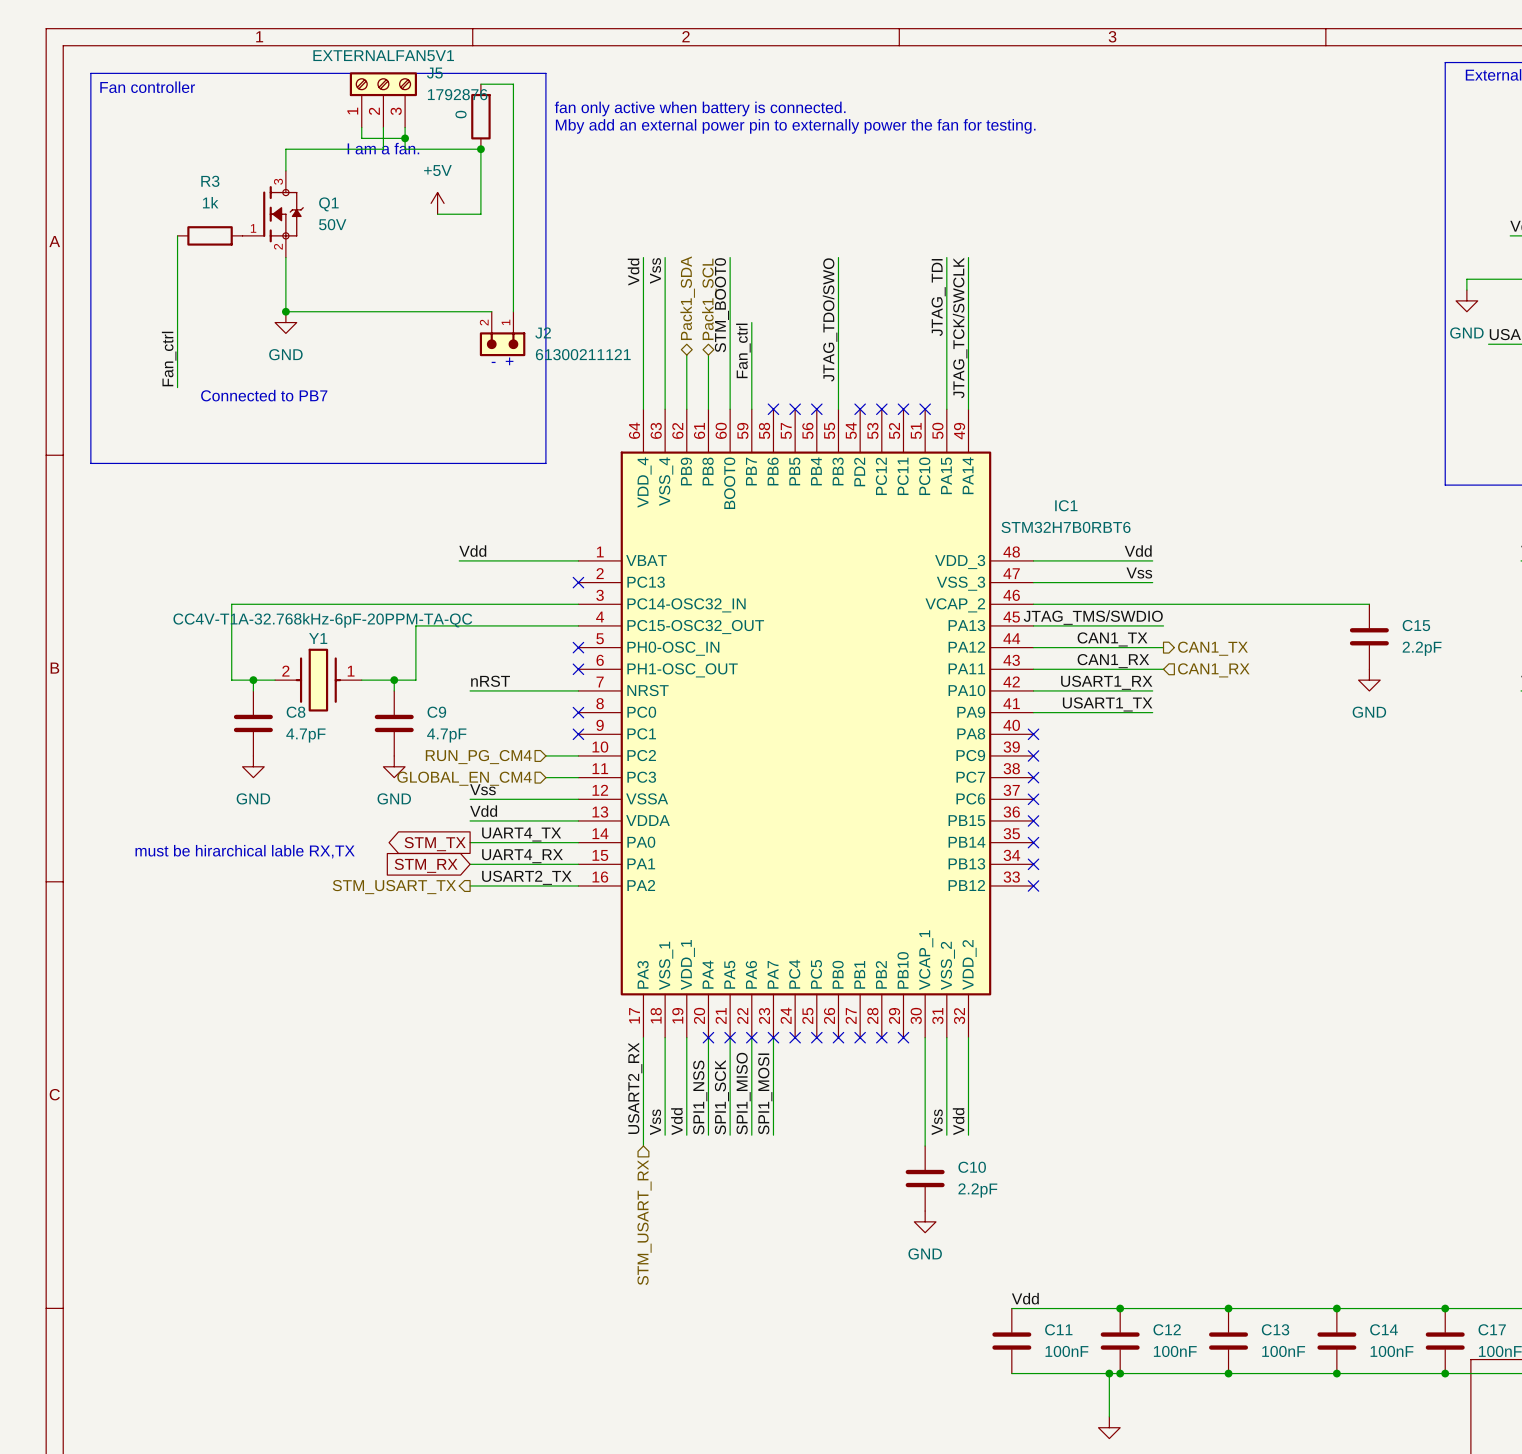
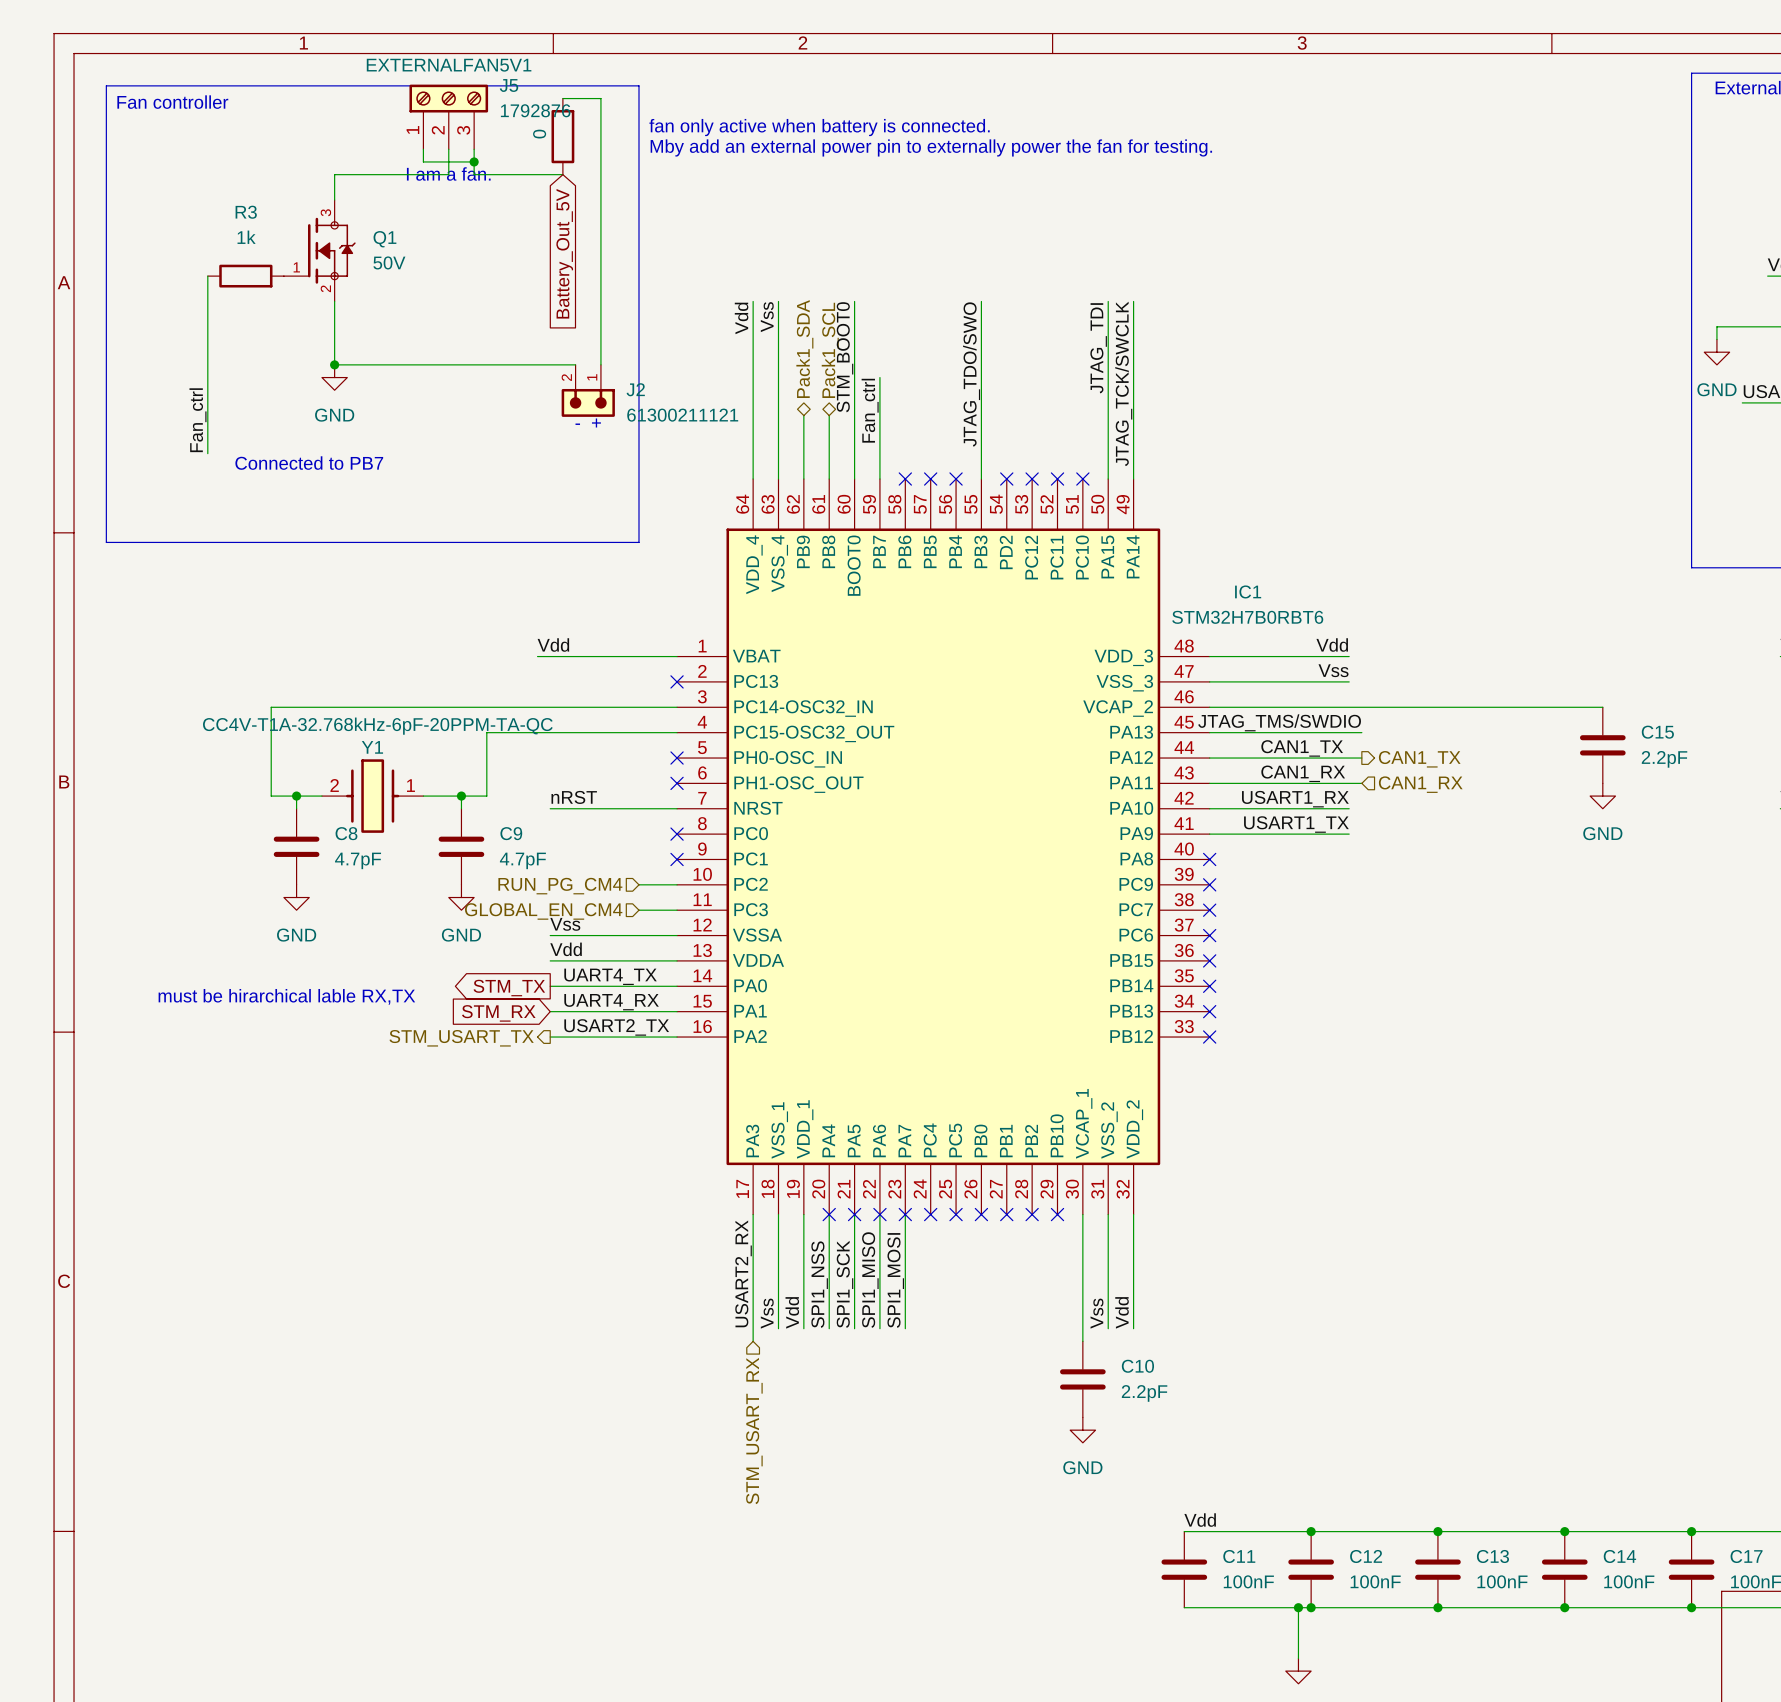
wire: (480, 149) (480, 214) (437, 214) -> none
junction: (480, 149) -> none
power symbol: +5V (437, 203) -> none
global label: none -> Battery_Out_5V (564, 253)

